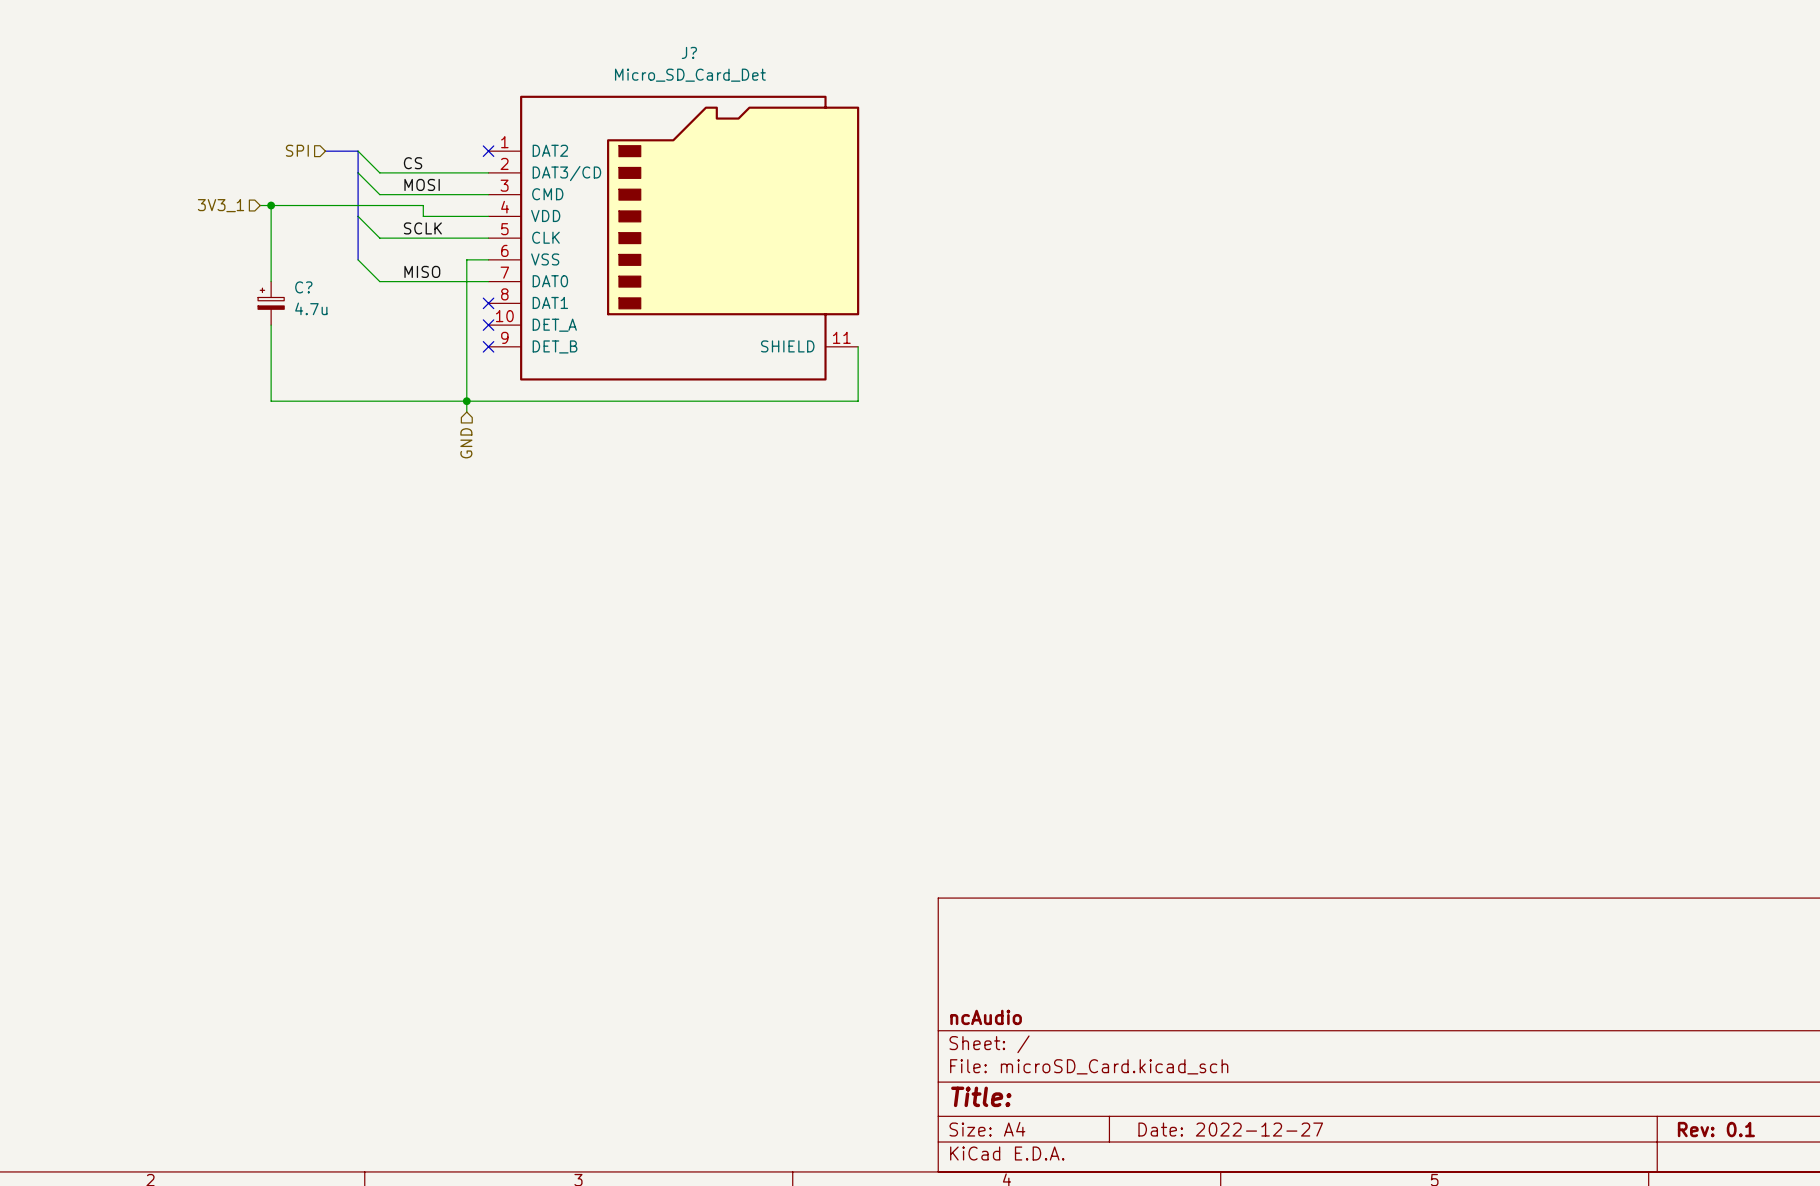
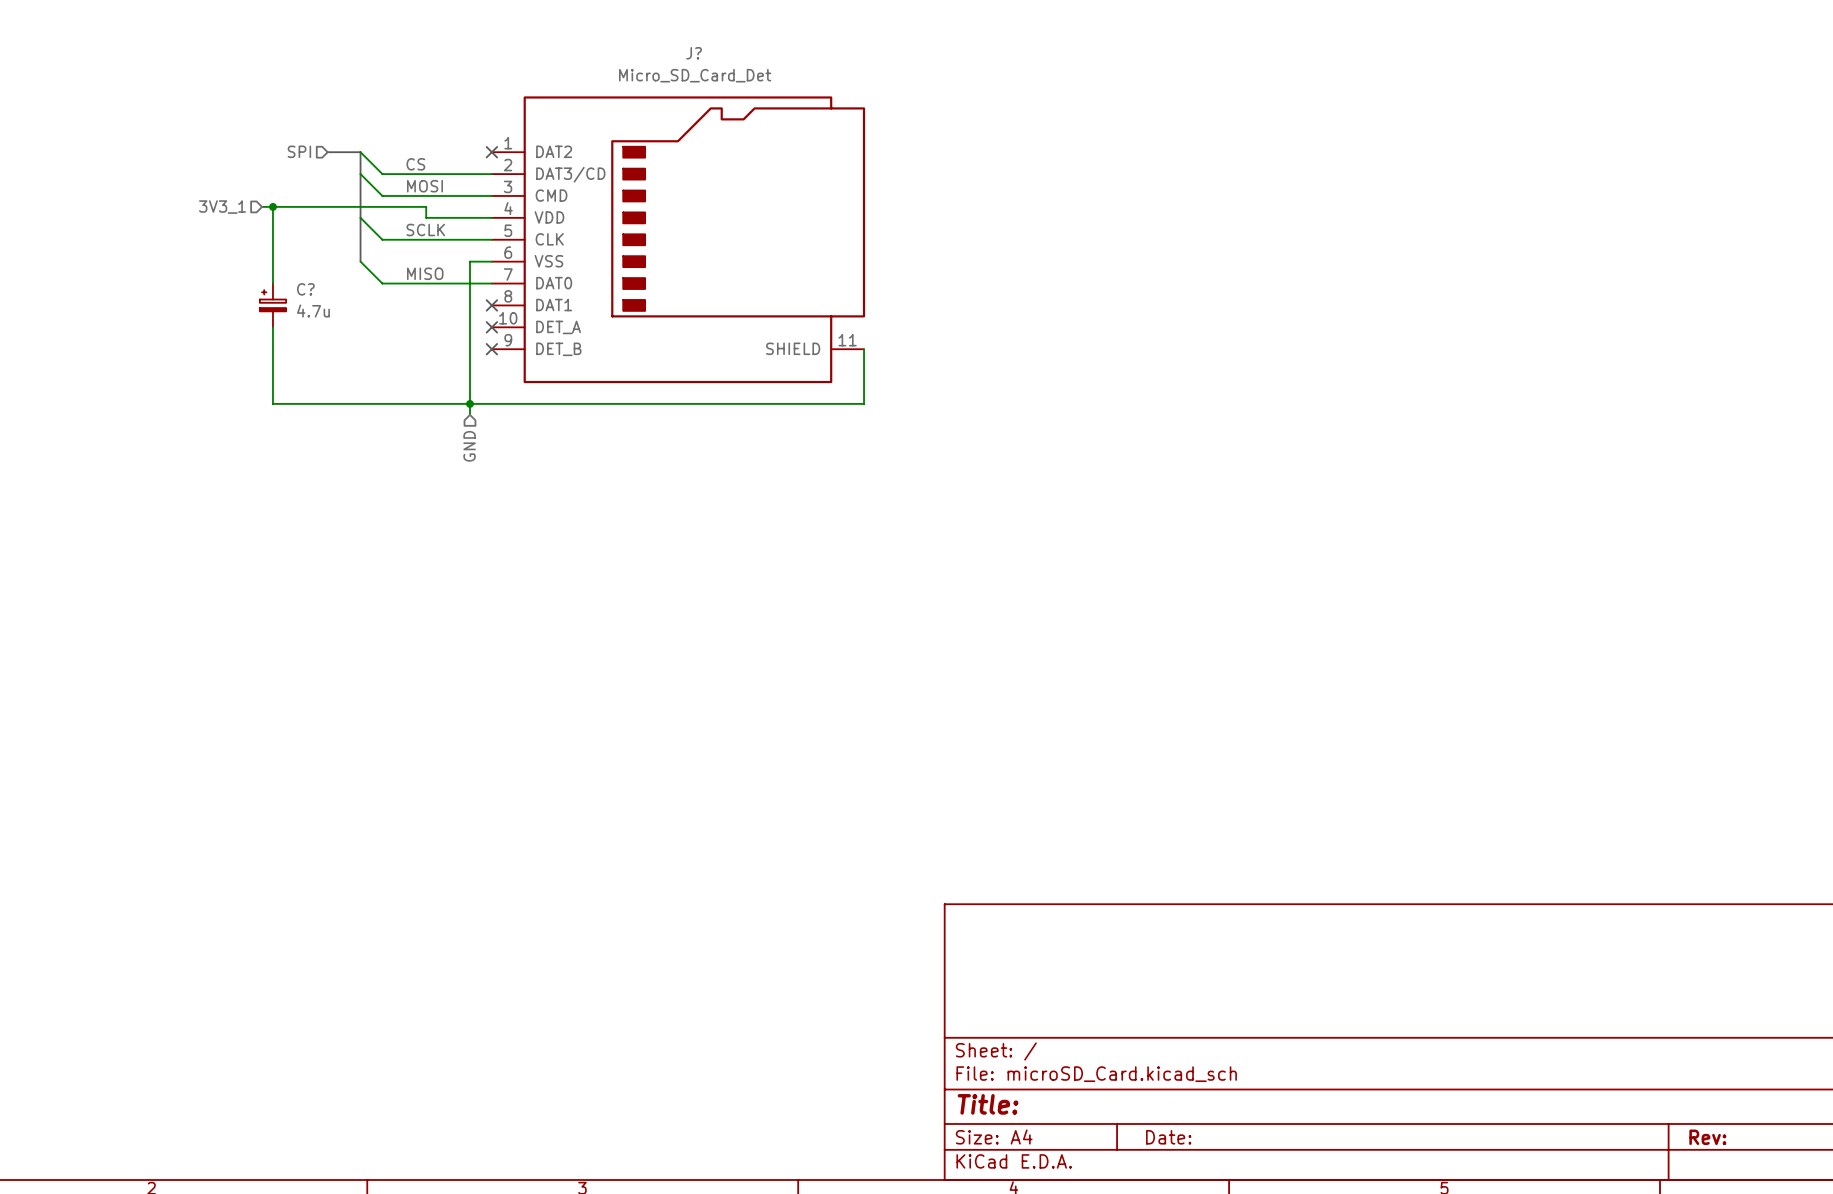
title block: ncAudio (986, 1017) -> none
title block: Date: 2022-12-27 (1230, 1129) -> Date: (1168, 1137)
title block: Rev: 0.1 (1716, 1129) -> Rev: (1707, 1137)

